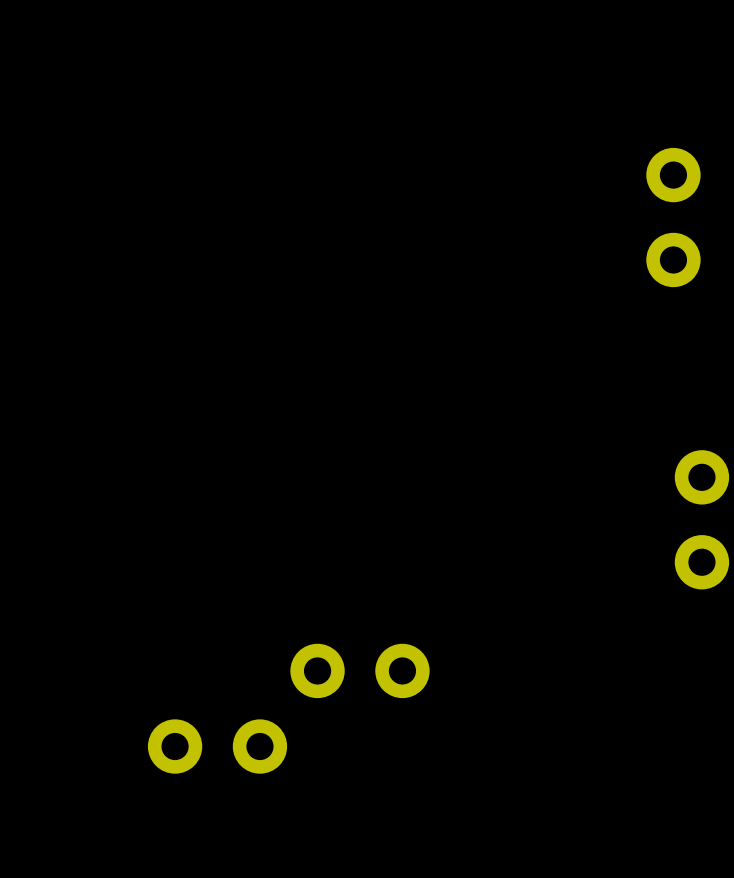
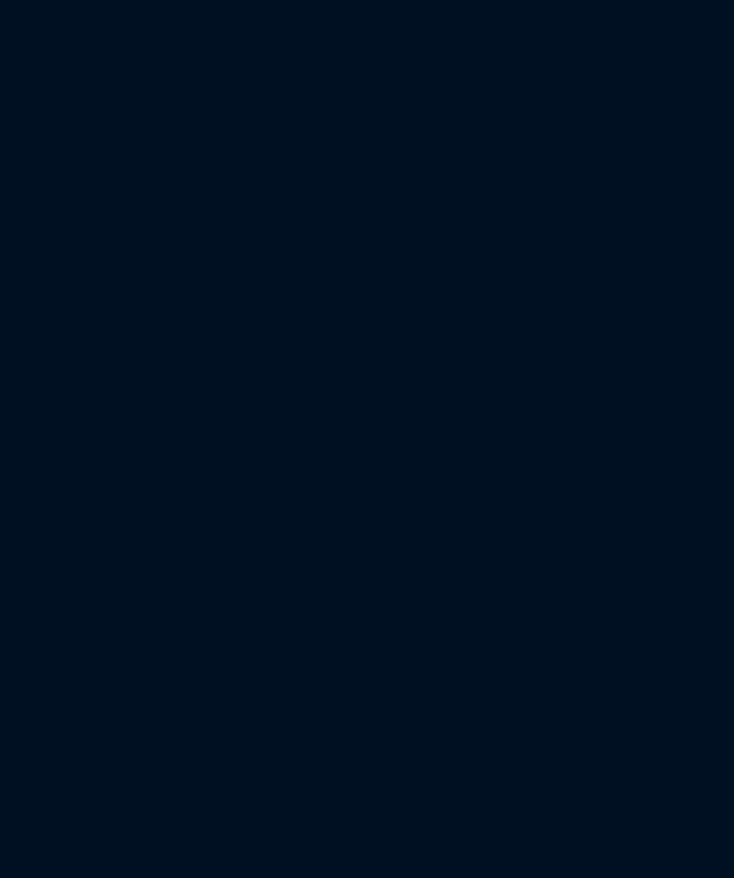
part: (673, 217) -> none
part: (701, 519) -> none
part: (360, 670) -> none
part: (217, 746) -> none

